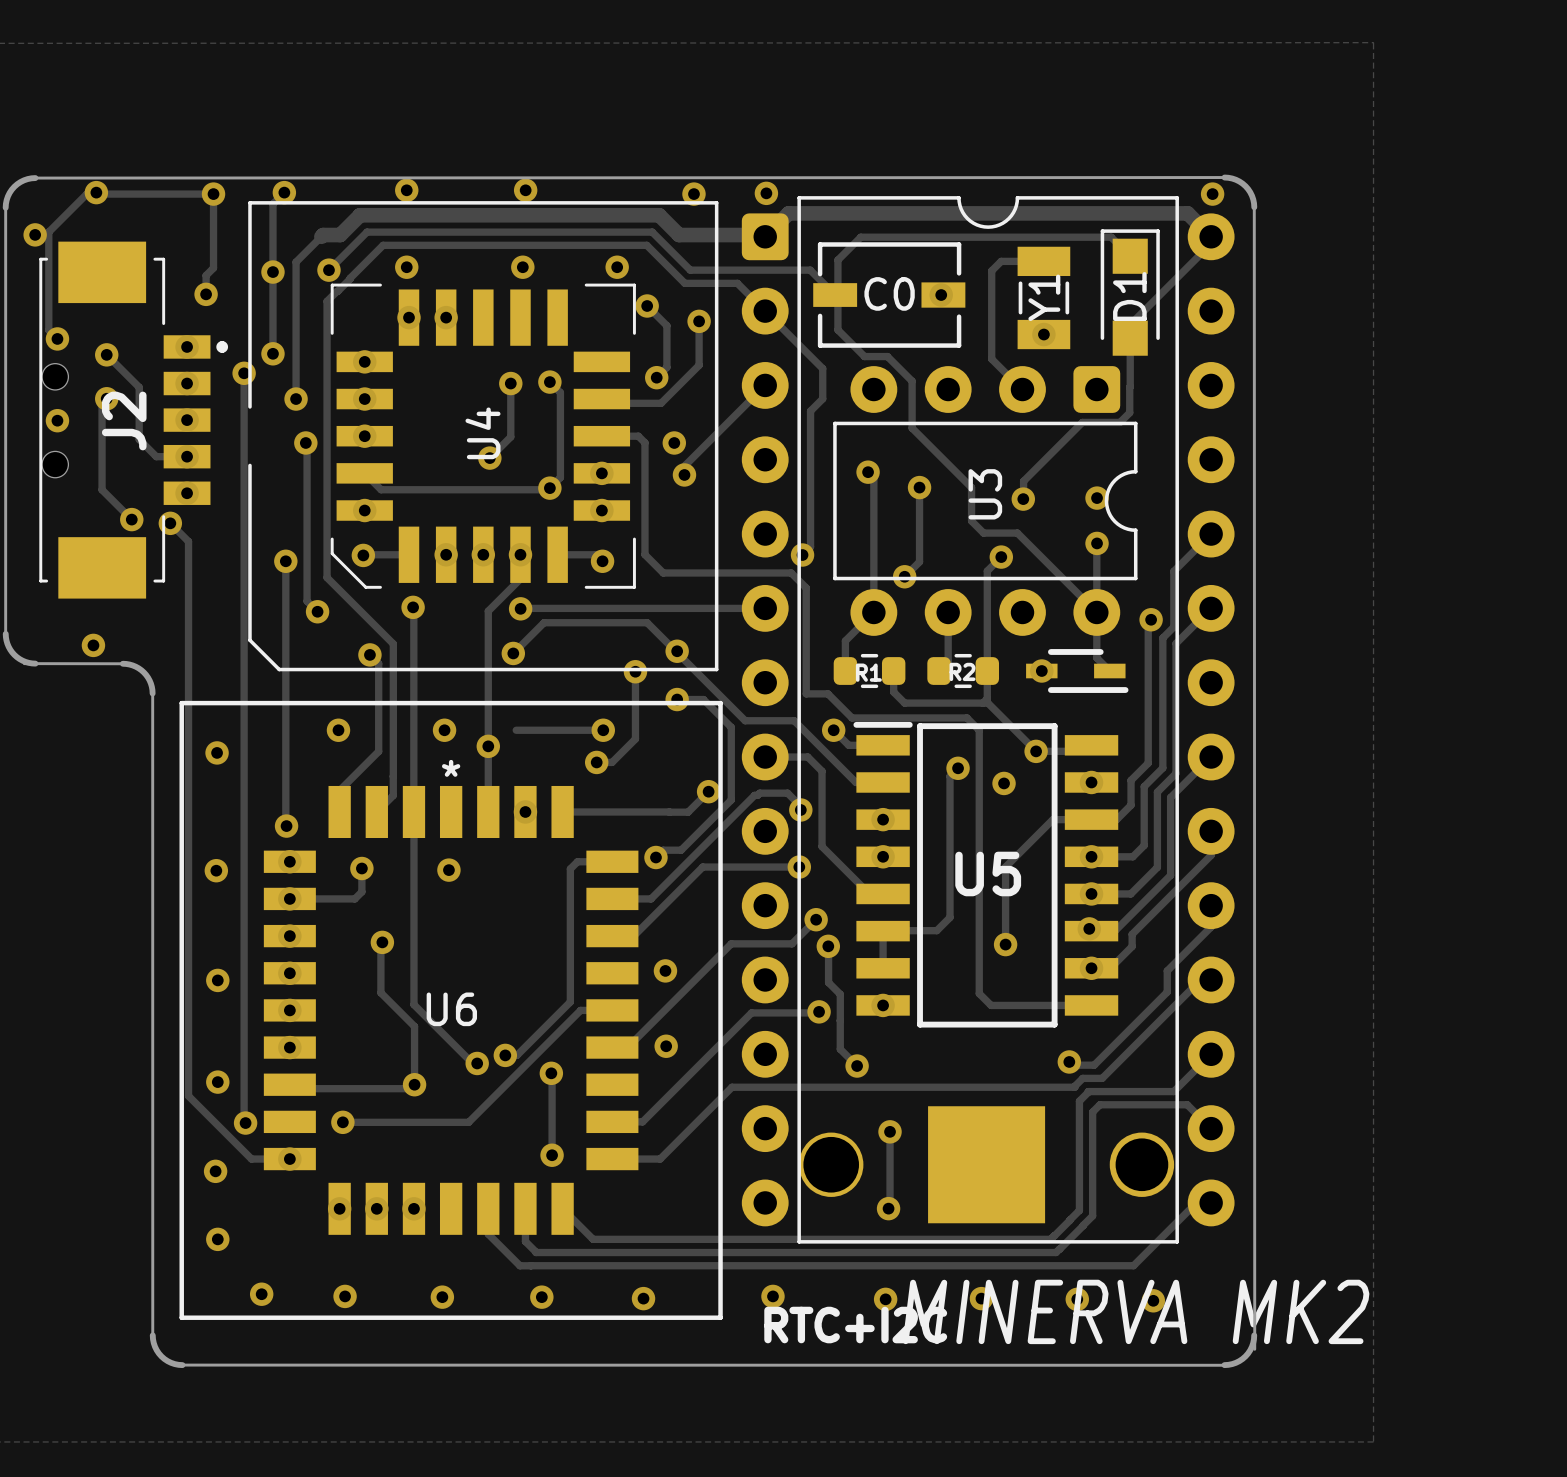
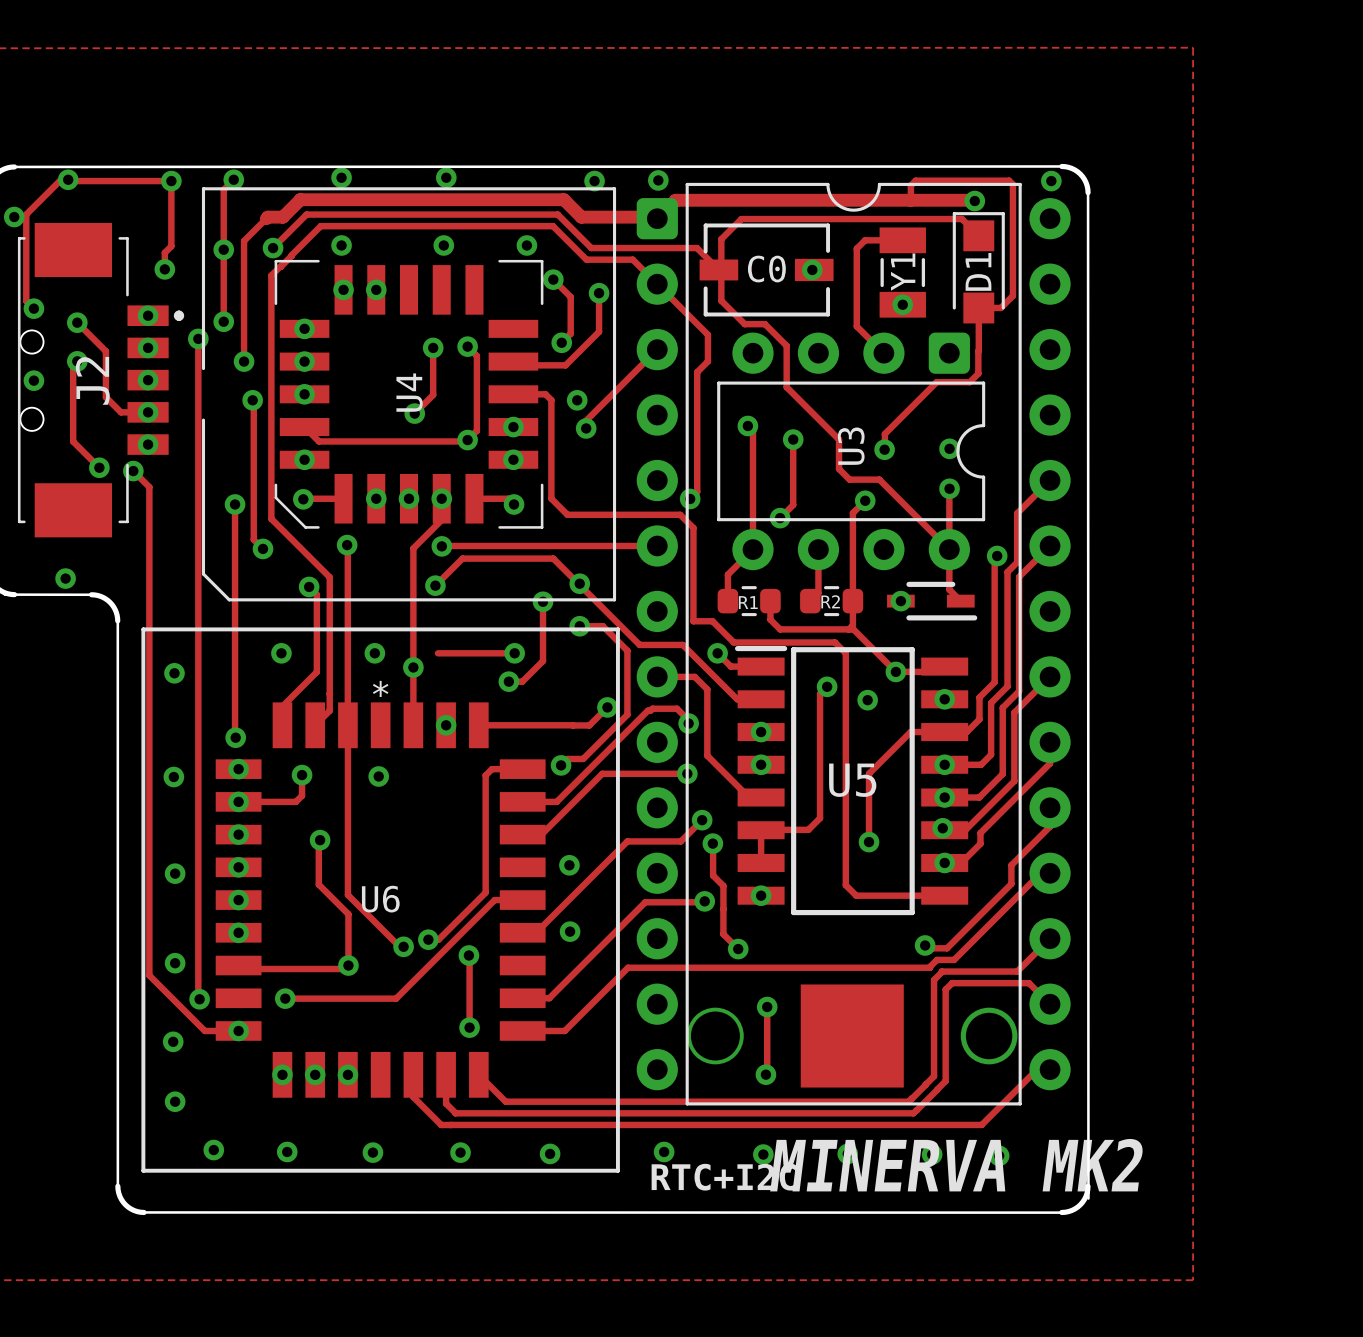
track: (786, 215) (788, 213) (1187, 213) (1211, 236) -> (675, 200) (974, 201)
track: none -> (910, 200) (910, 185) (915, 180) (1009, 180) (1012, 184) (1012, 295) (1000, 307) (978, 307)
via: none -> (974, 201)
track: (1211, 243) (1130, 324) -> none

